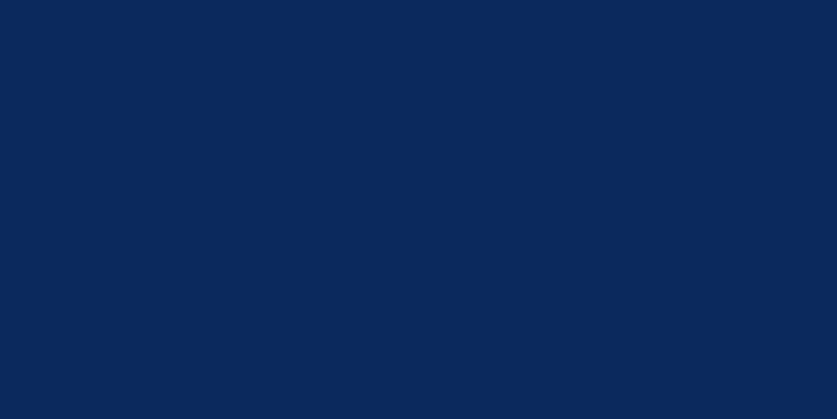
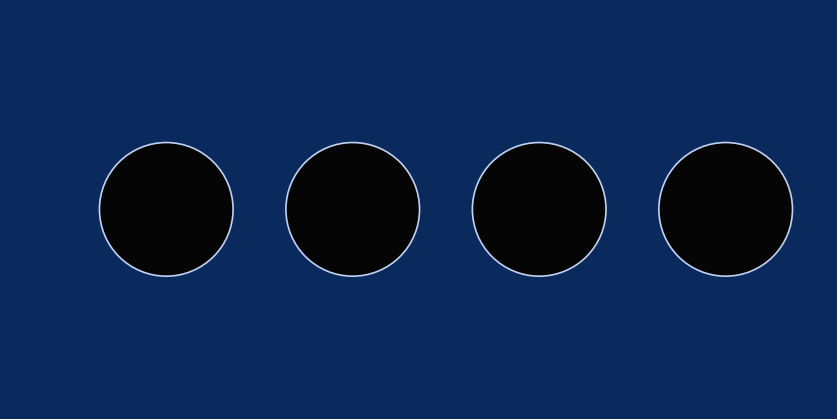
part: none -> (166, 209)
part: none -> (352, 209)
part: none -> (539, 209)
part: none -> (725, 209)

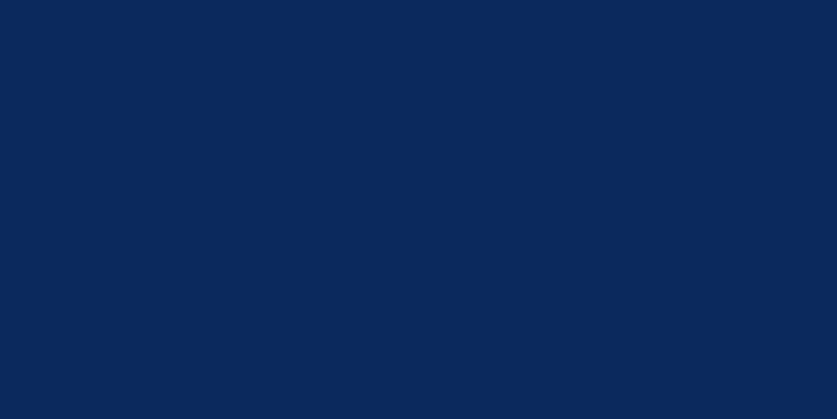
part: (166, 209) -> none
part: (352, 209) -> none
part: (539, 209) -> none
part: (725, 209) -> none

